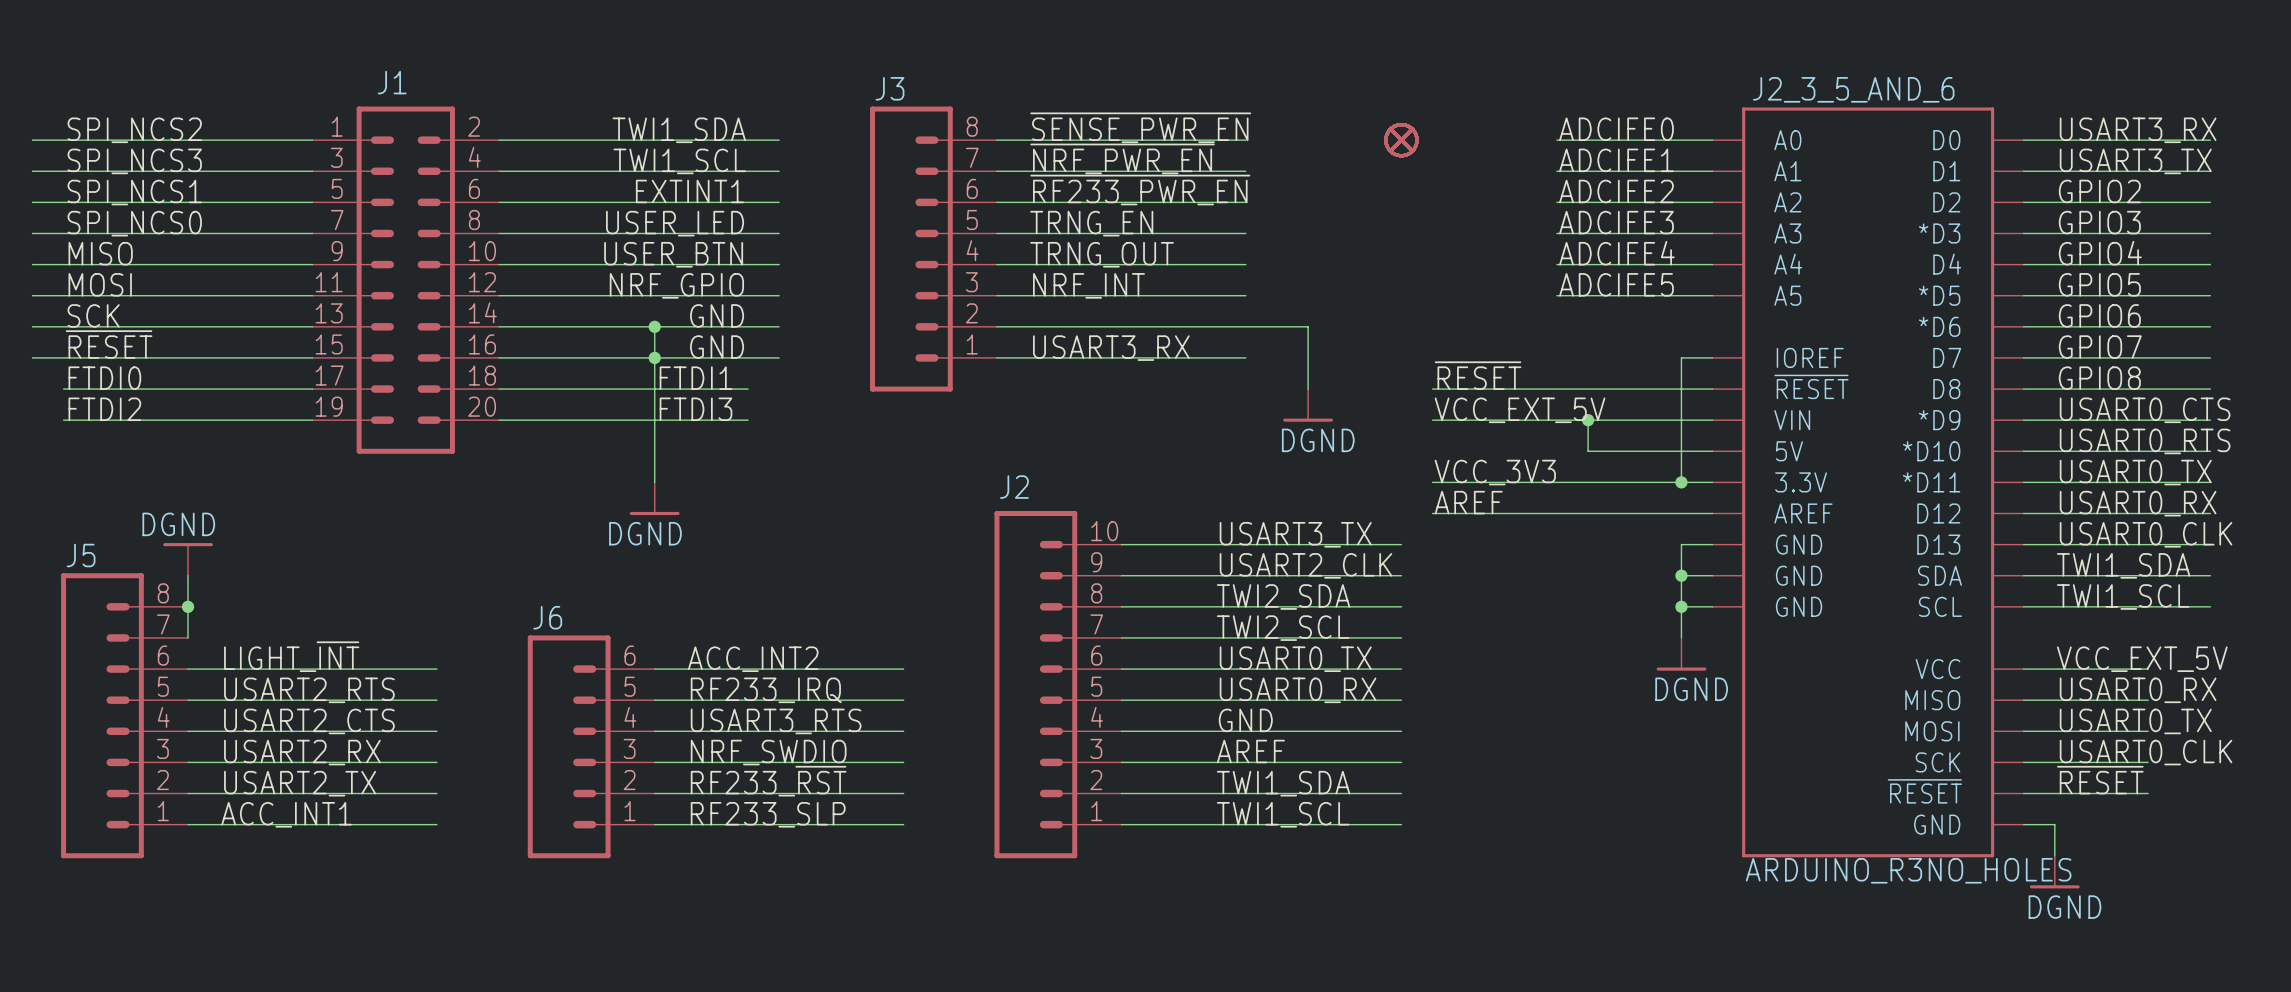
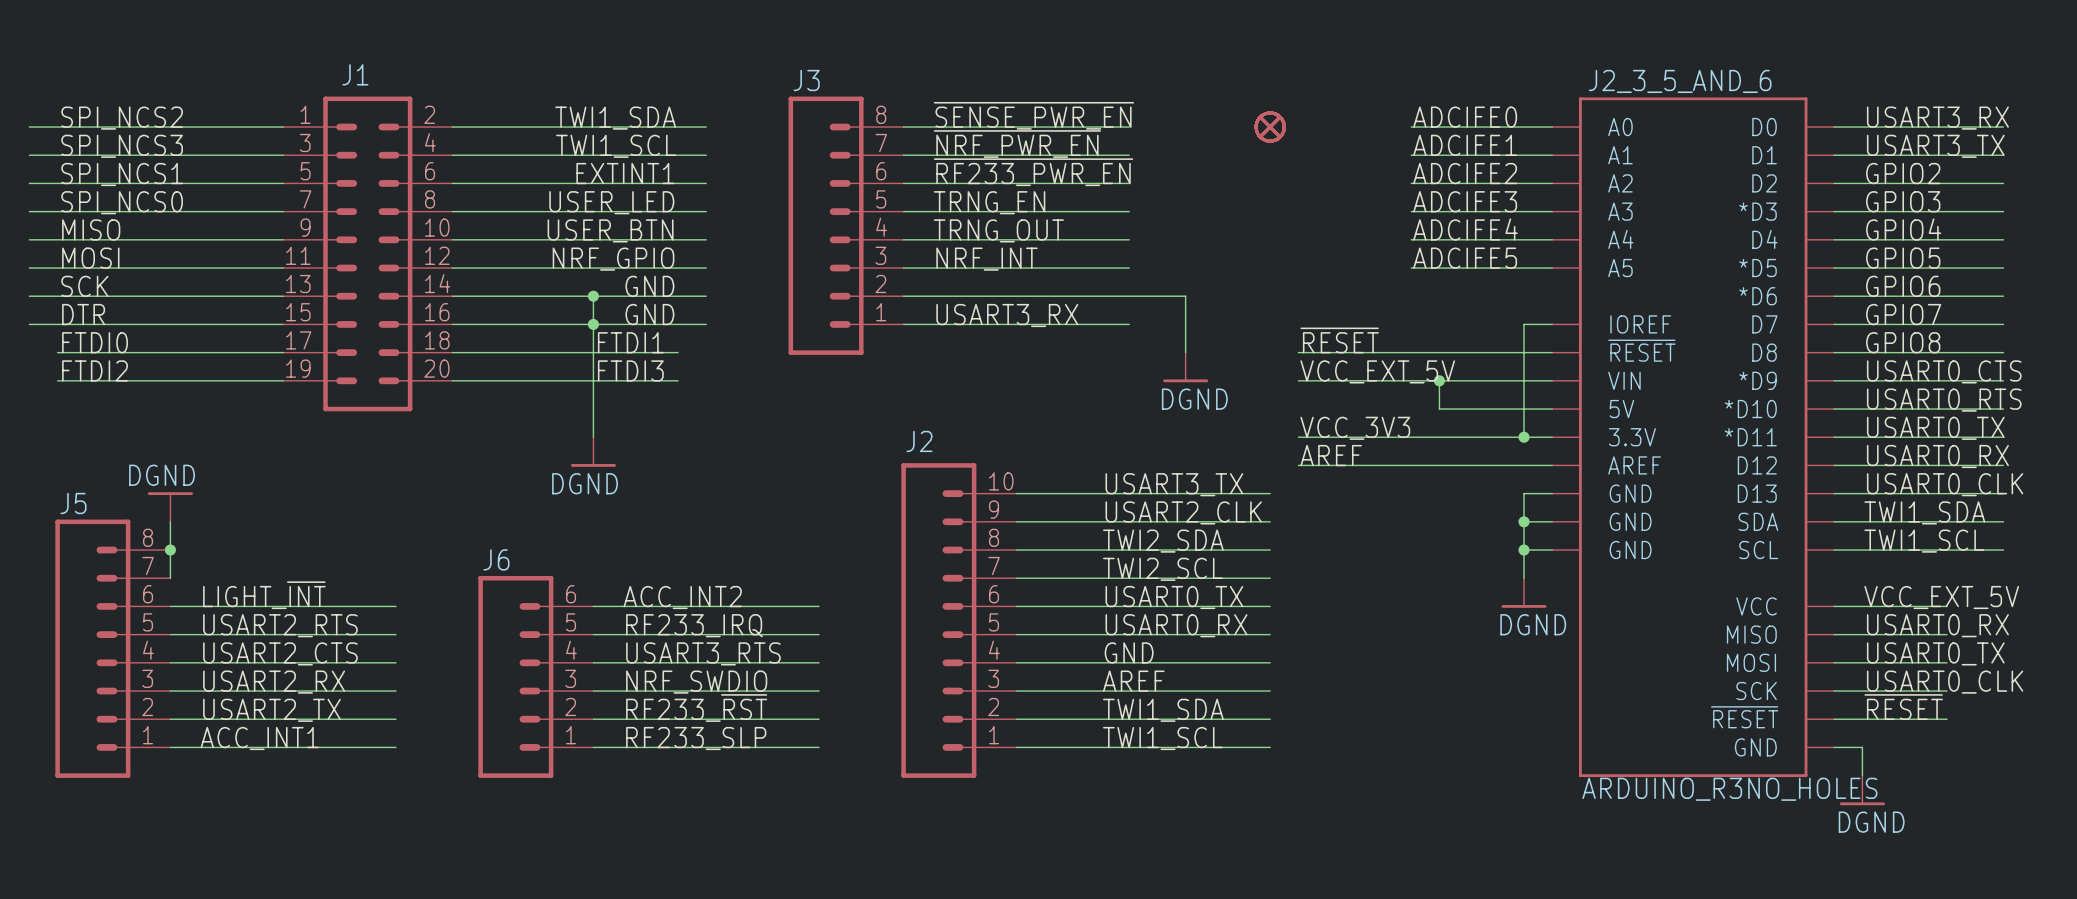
label: ~{RESET} (109, 344) -> DTR (83, 314)

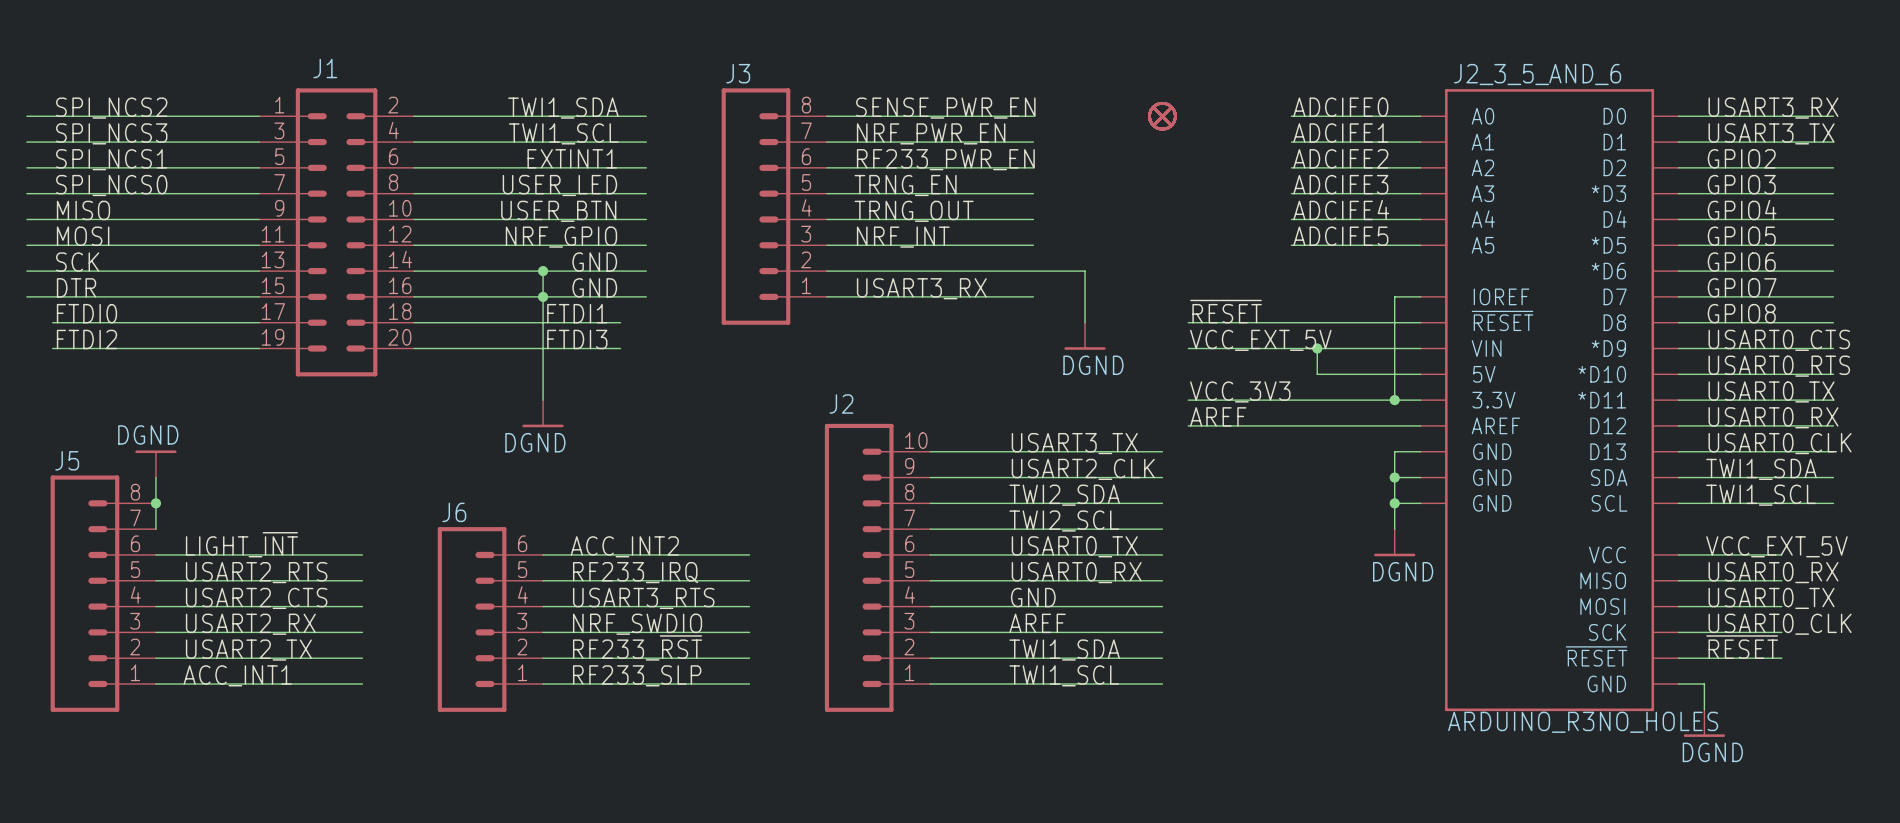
label: ~{SENSE_PWR_EN} (1033, 115) -> SENSE_PWR_EN (945, 108)
label: ~{NRF_PWR_EN} (1017, 144) -> NRF_PWR_EN (931, 133)
label: ~{RF233_PWR_EN} (1033, 172) -> RF233_PWR_EN (945, 159)

